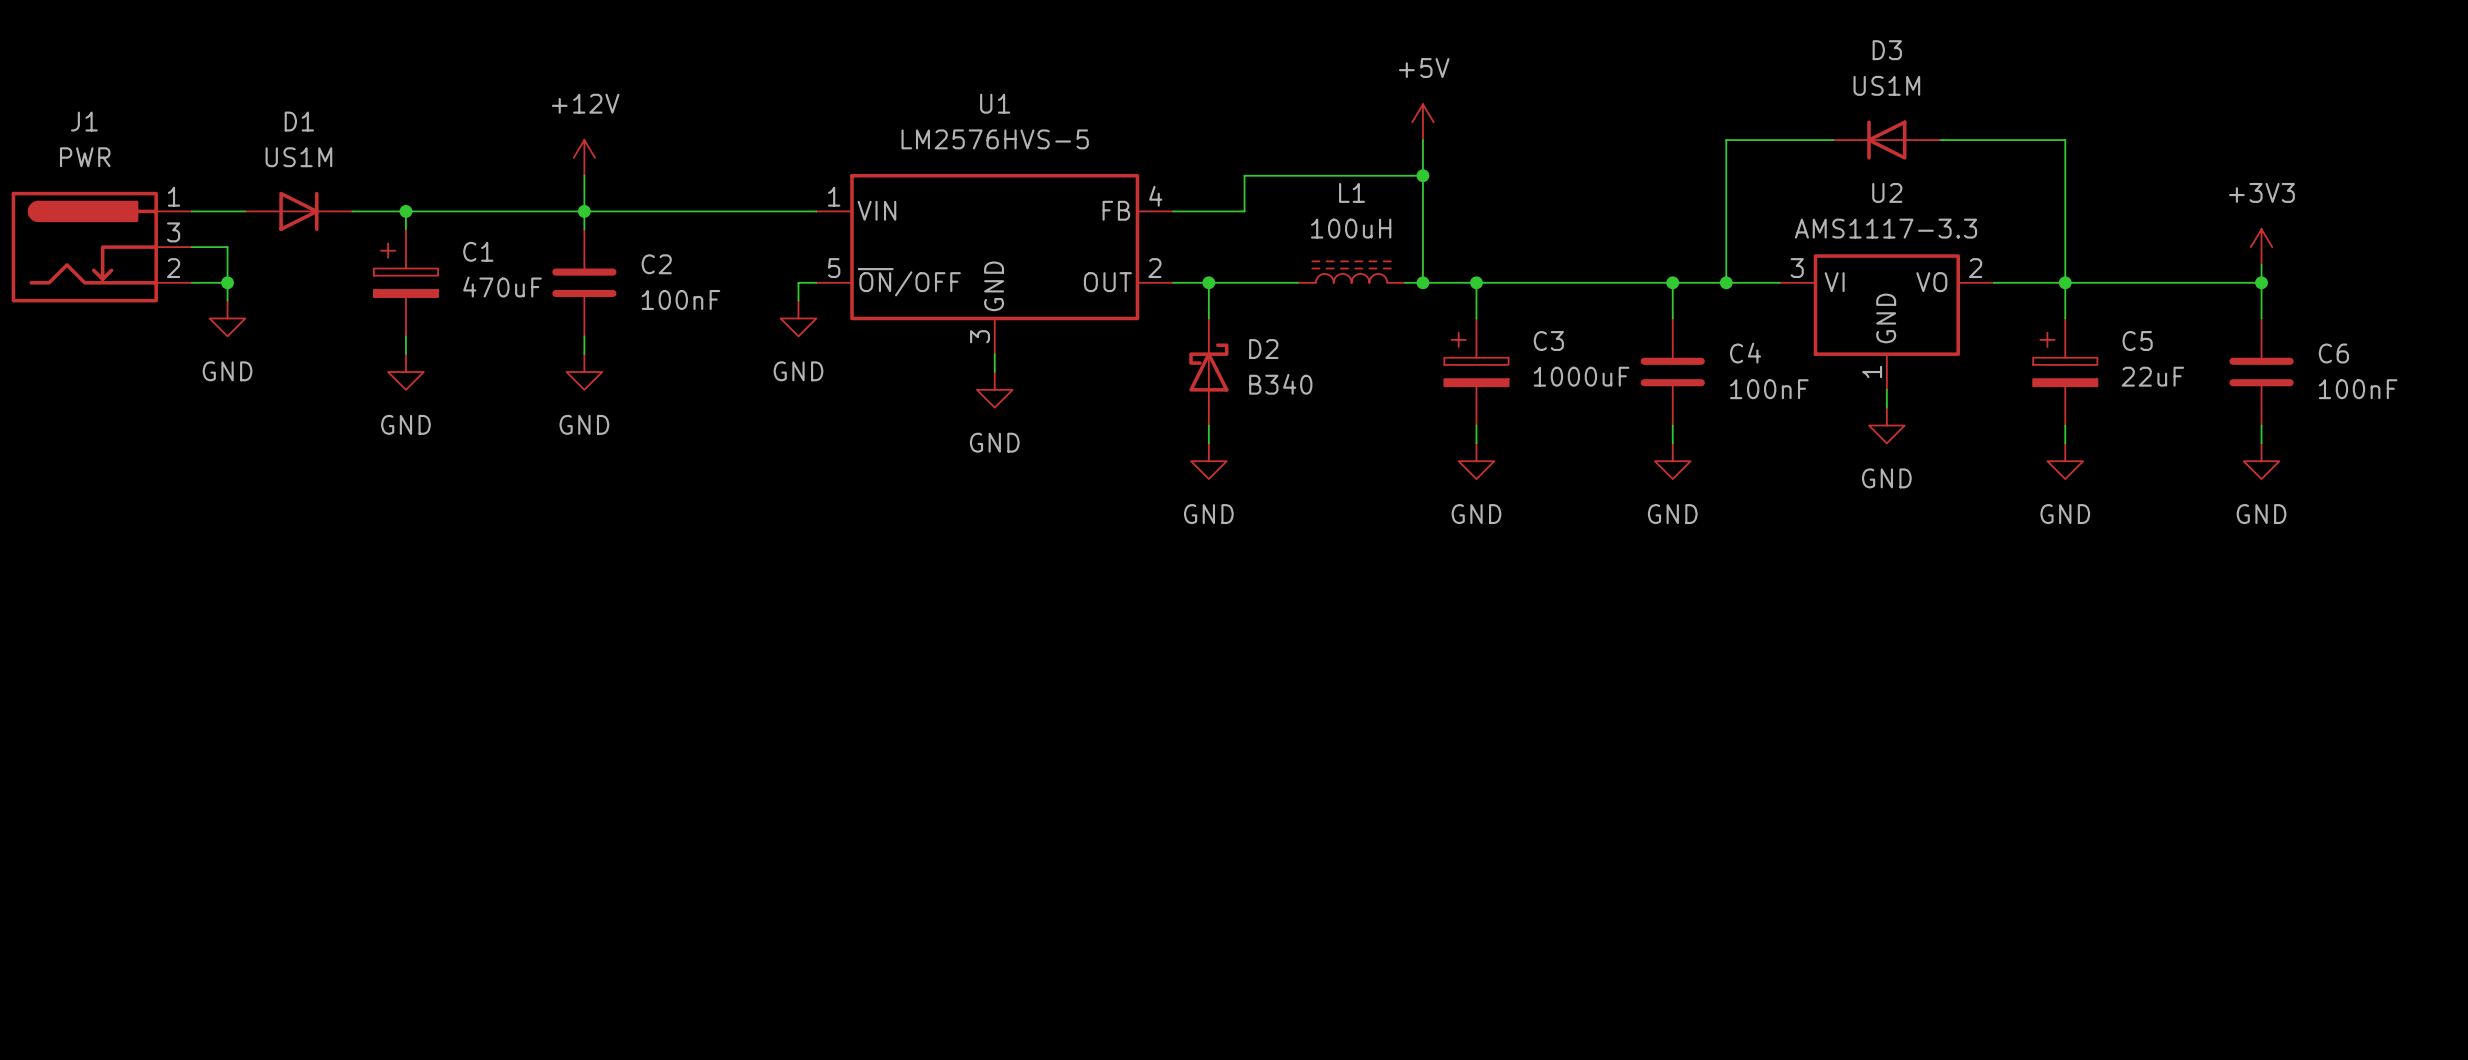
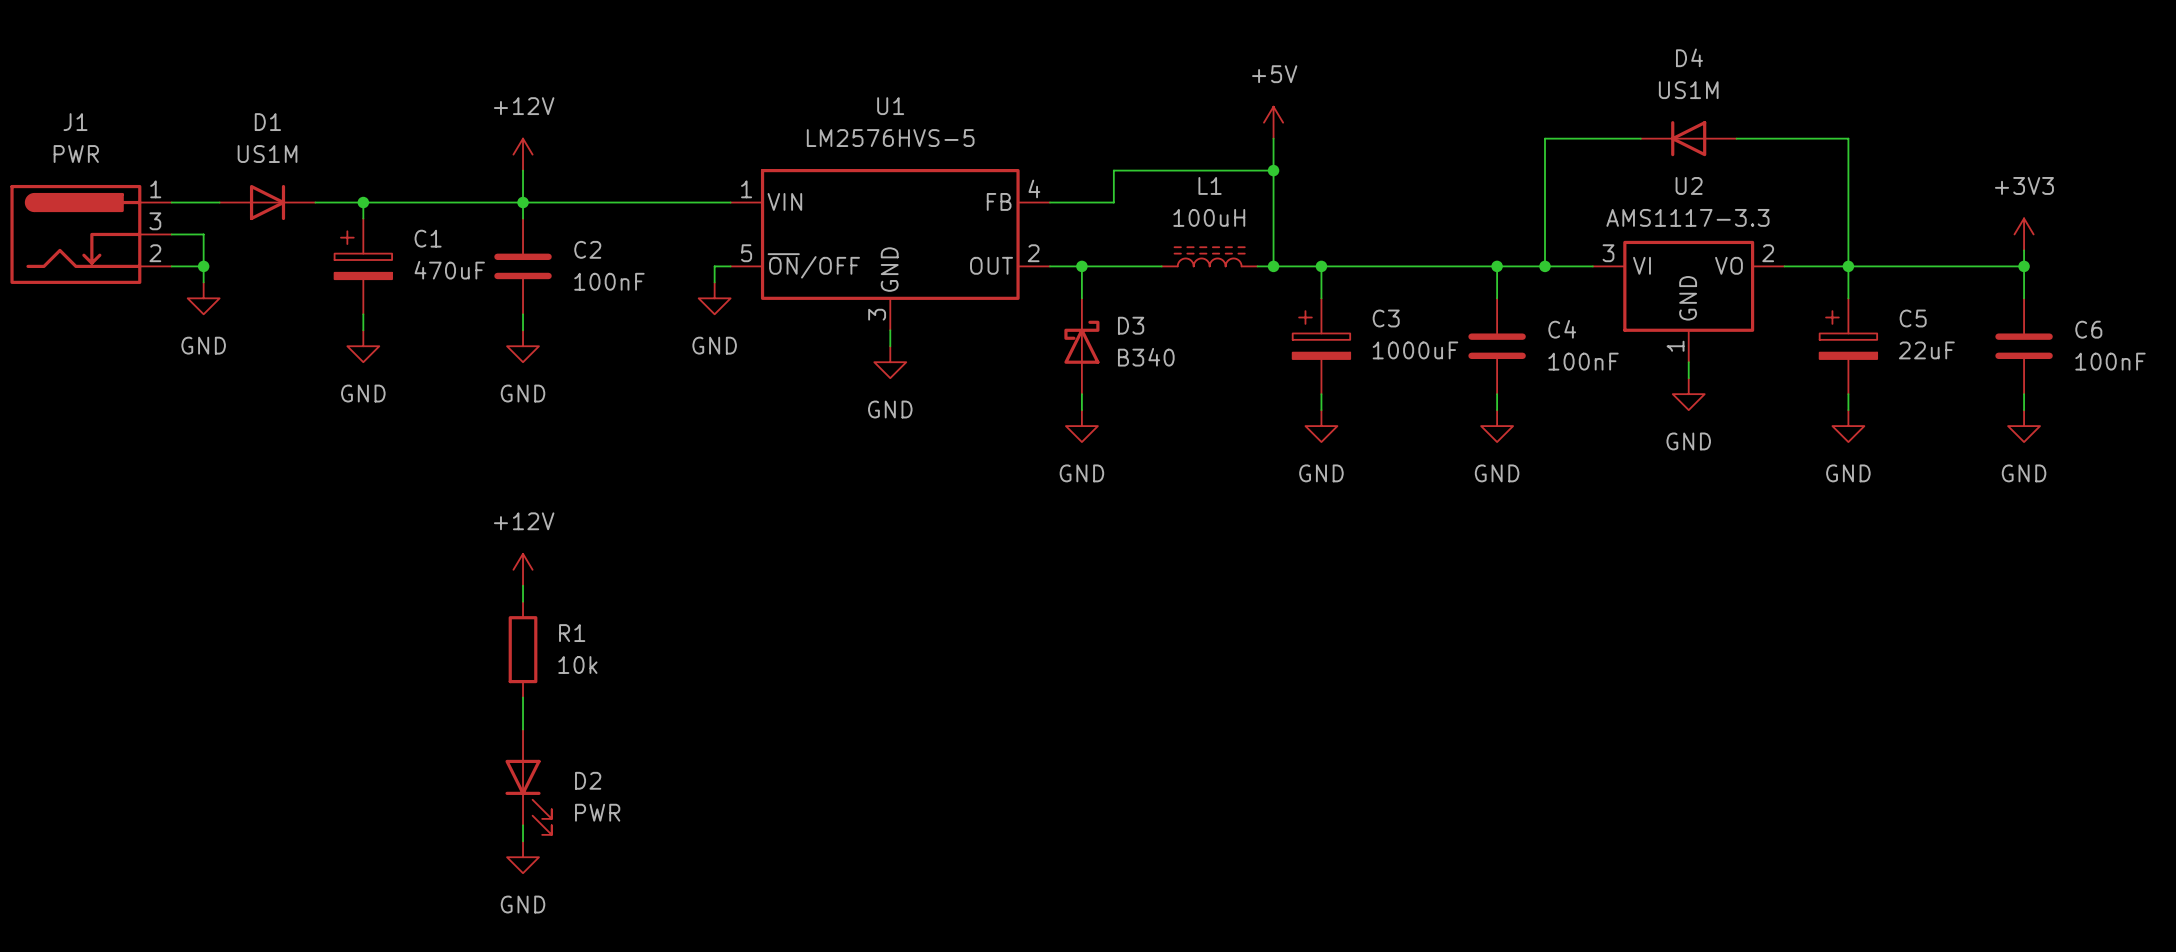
D3 name: D3 (1887, 50) -> D4 (1689, 57)
D2 name: D2 (1263, 349) -> D3 (1131, 325)
power symbol: none -> +12V (523, 569)
wire: none -> (523, 585) (523, 601)
R1: none -> 10k (523, 649)
wire: none -> (523, 697) (523, 729)
D2: none -> PWR (528, 782)
wire: none -> (523, 825) (523, 841)
power symbol: none -> GND (523, 857)

